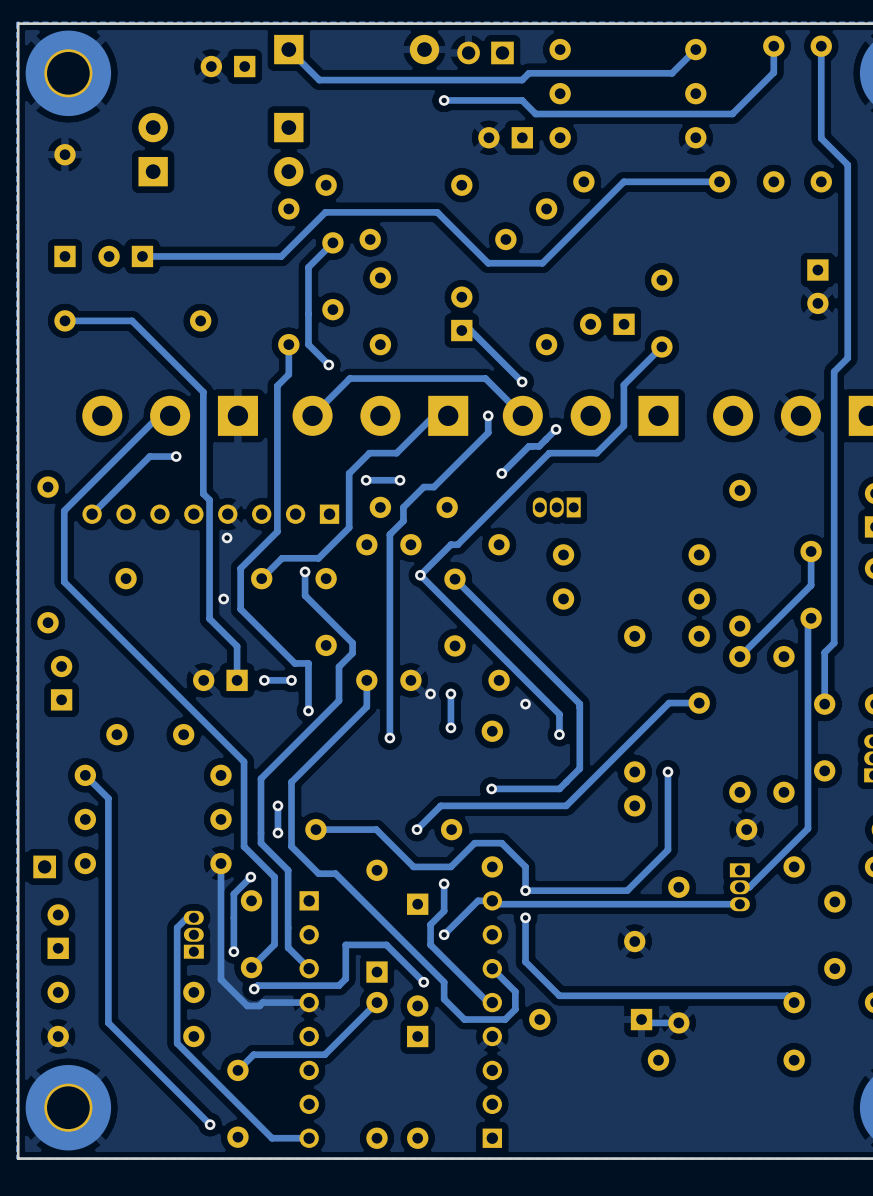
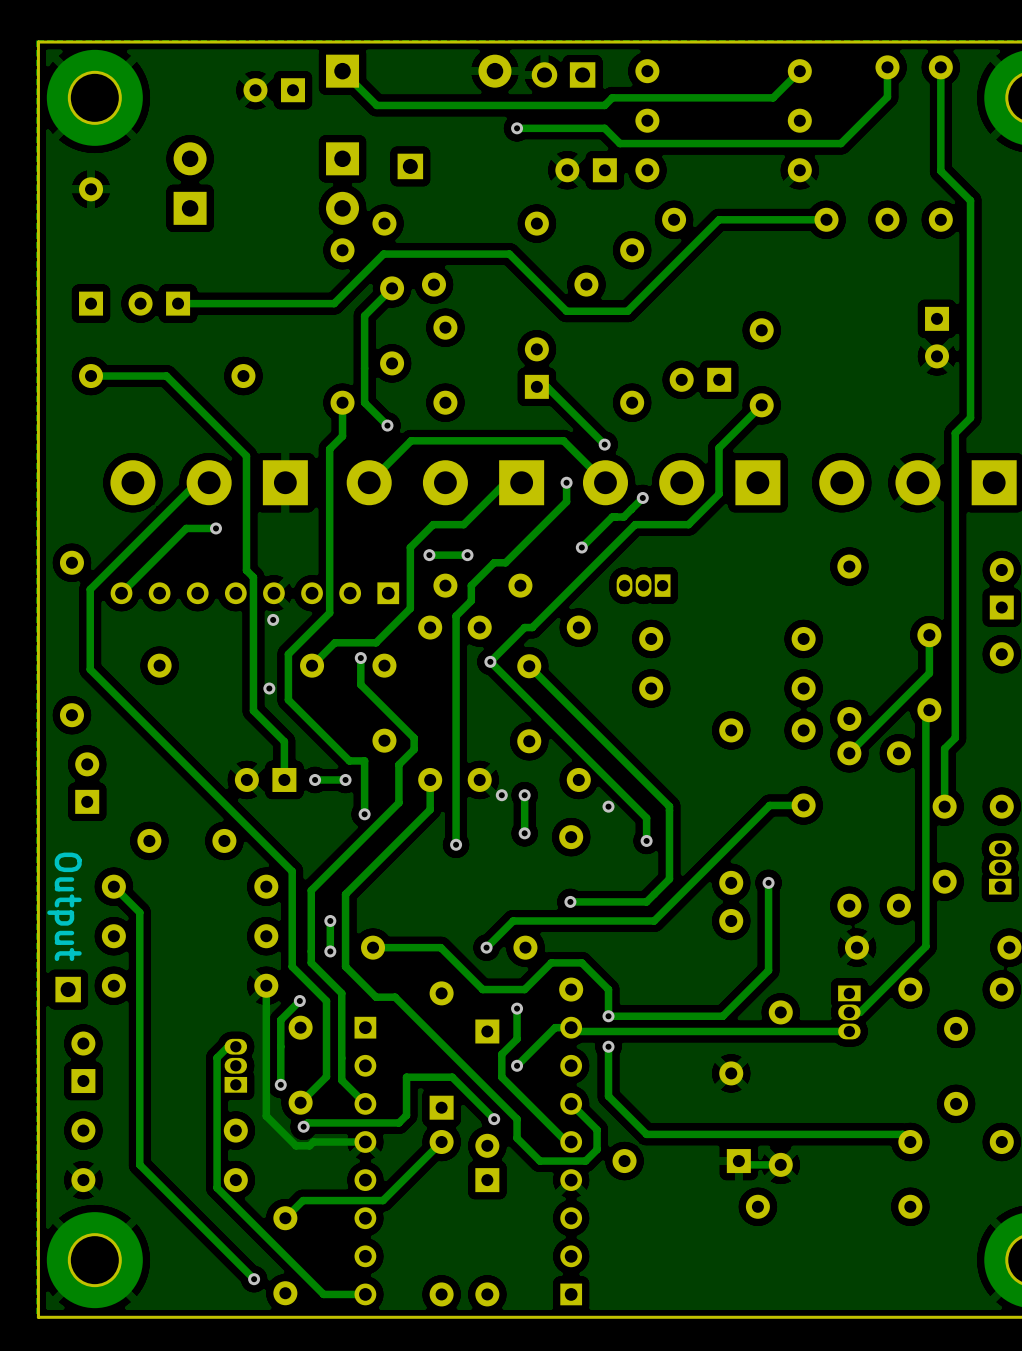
part: none -> (410, 166)
text: none -> Output (64, 906)

